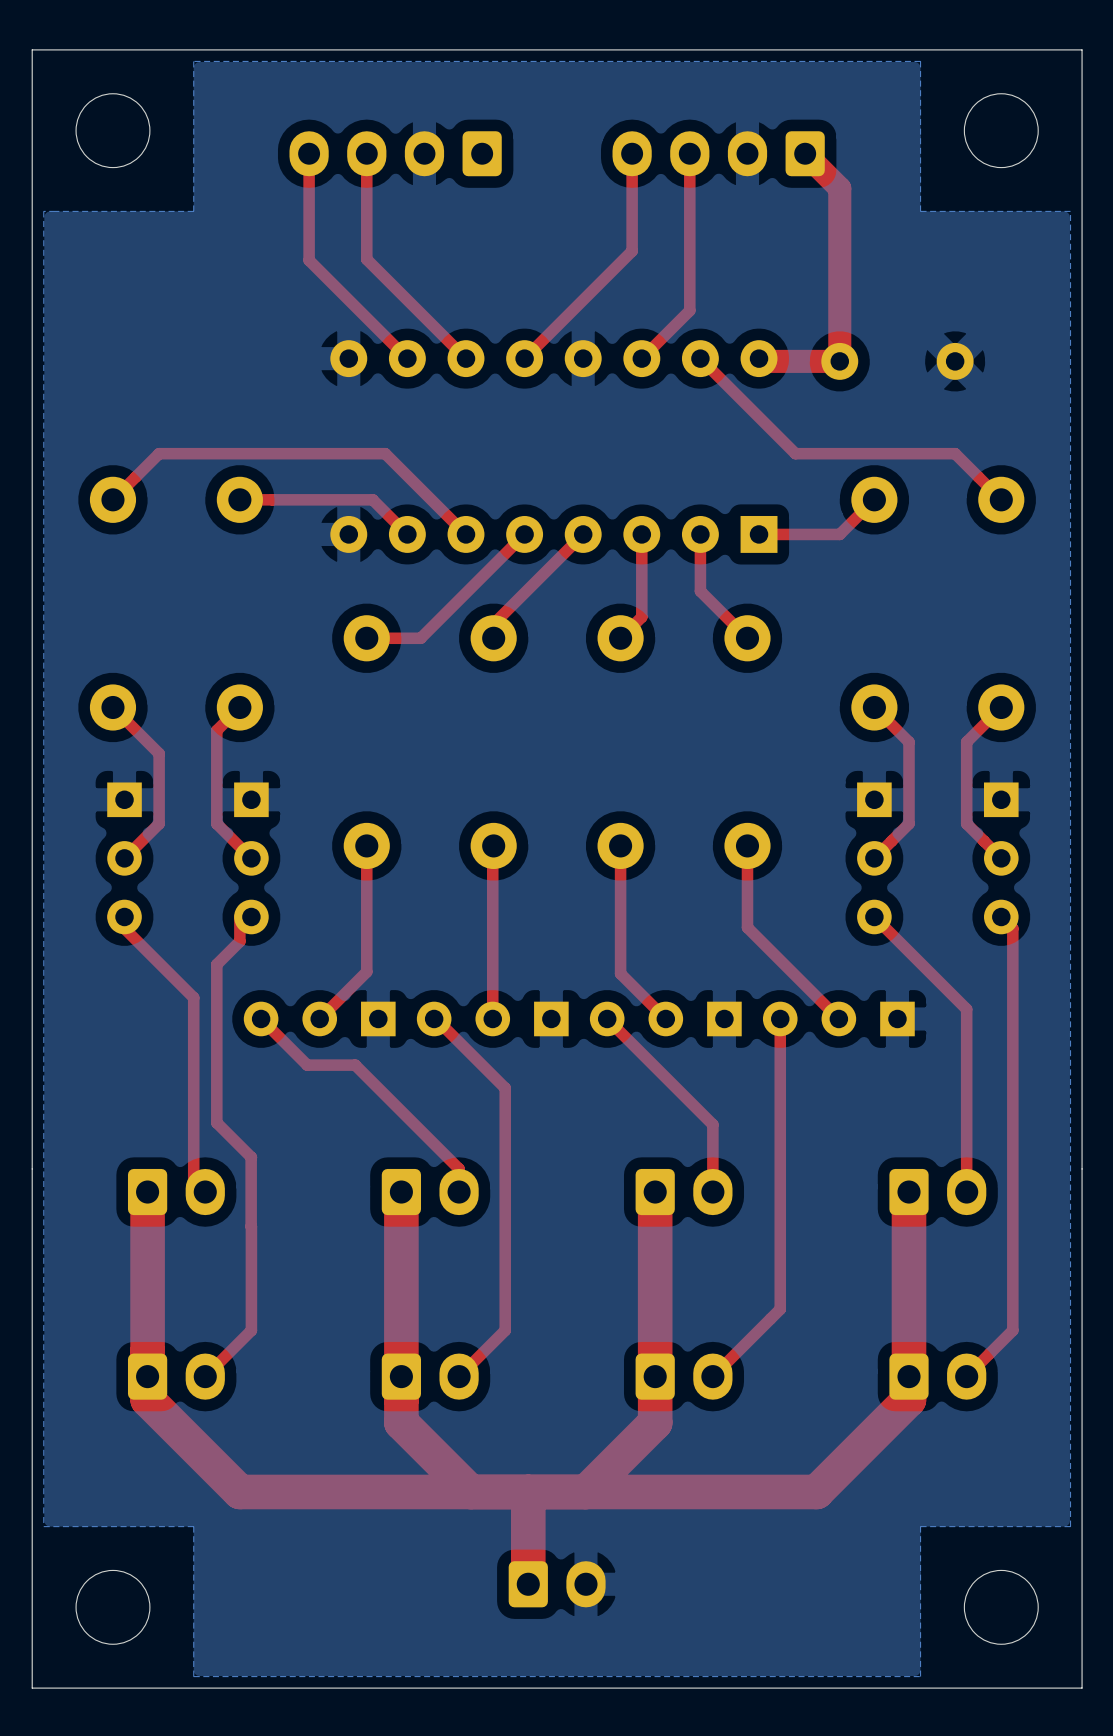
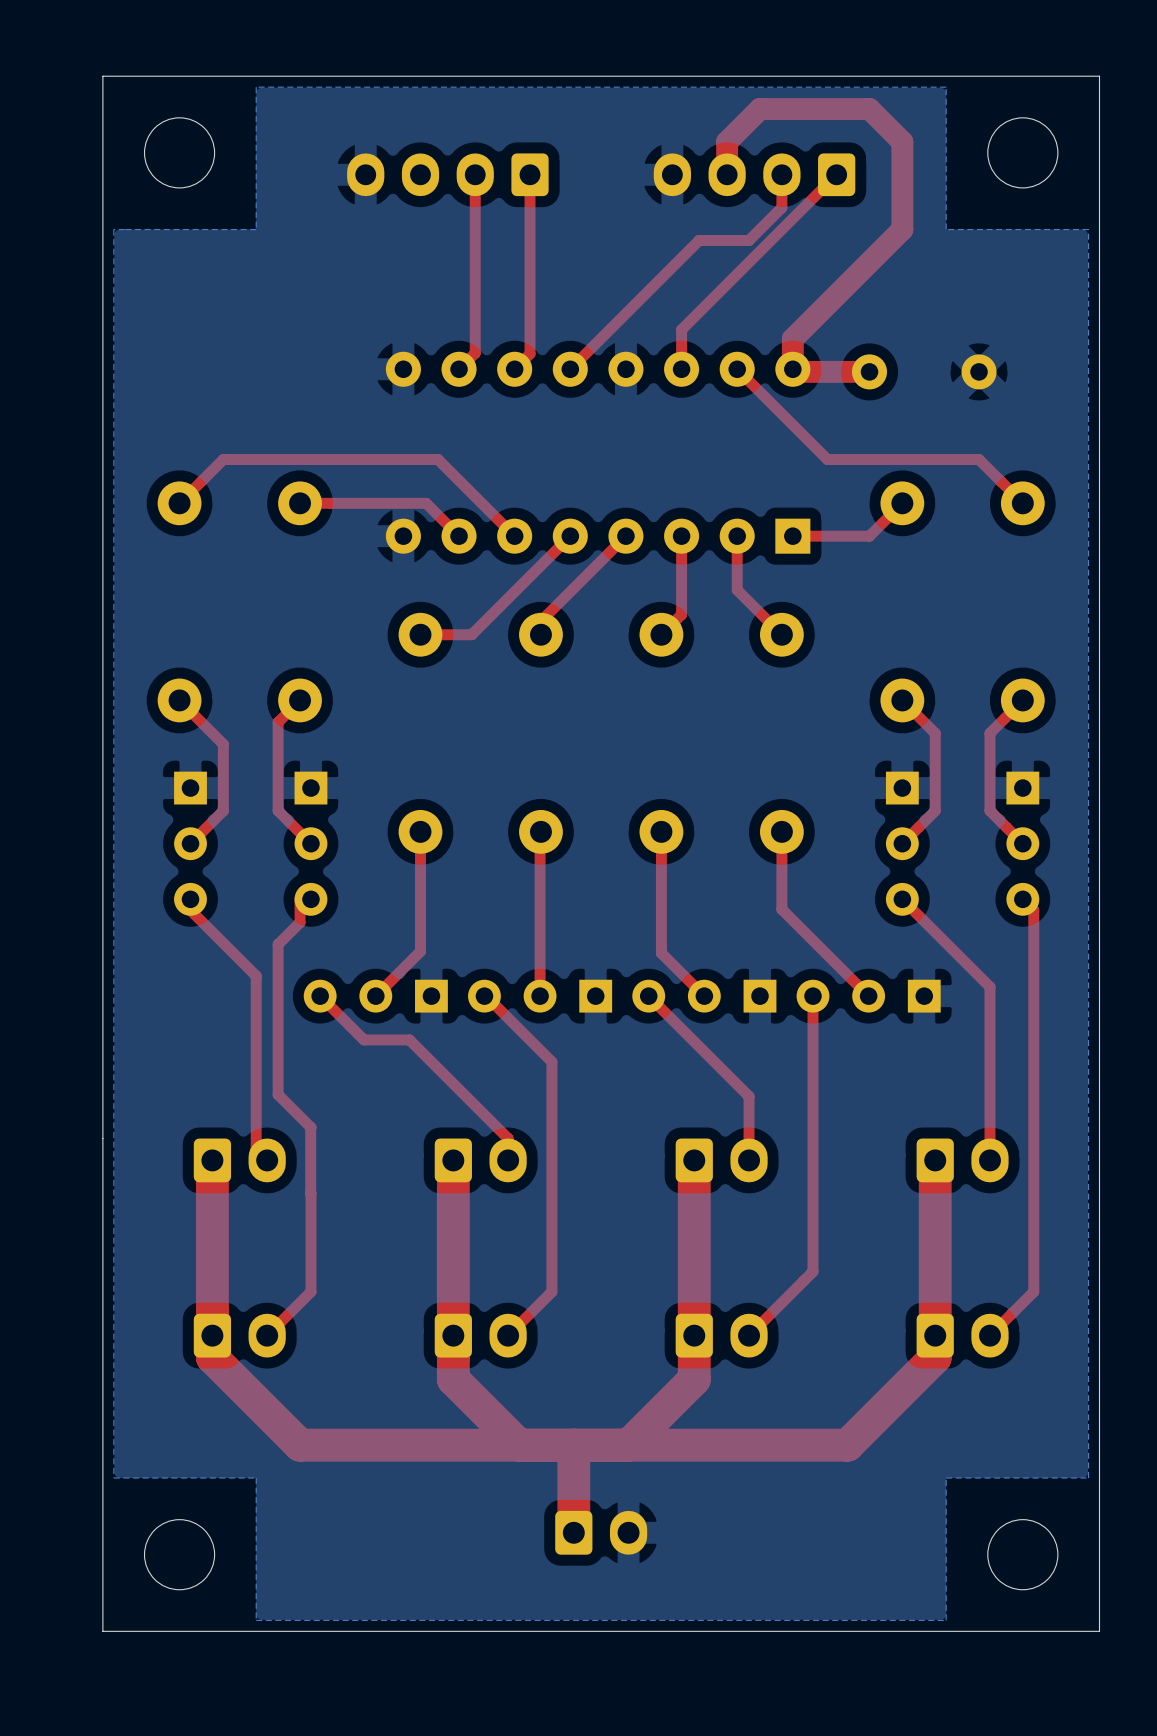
top track: (309, 153) (309, 260) (407, 358) -> (475, 174) (475, 353) (459, 369)
top track: (366, 153) (366, 259) (466, 358) -> (530, 174) (530, 353) (514, 369)
top track: (632, 153) (632, 251) -> (781, 174) (781, 207) (749, 240) (699, 240) (672, 267)
top track: (689, 153) (689, 310) (641, 358) -> (836, 174) (681, 329) (681, 369)
top track: none -> (727, 174) (727, 141) (759, 109) (869, 109) (902, 141) (902, 229) (792, 339) (792, 369)
top track: (805, 153) (839, 188) (839, 361) -> none

